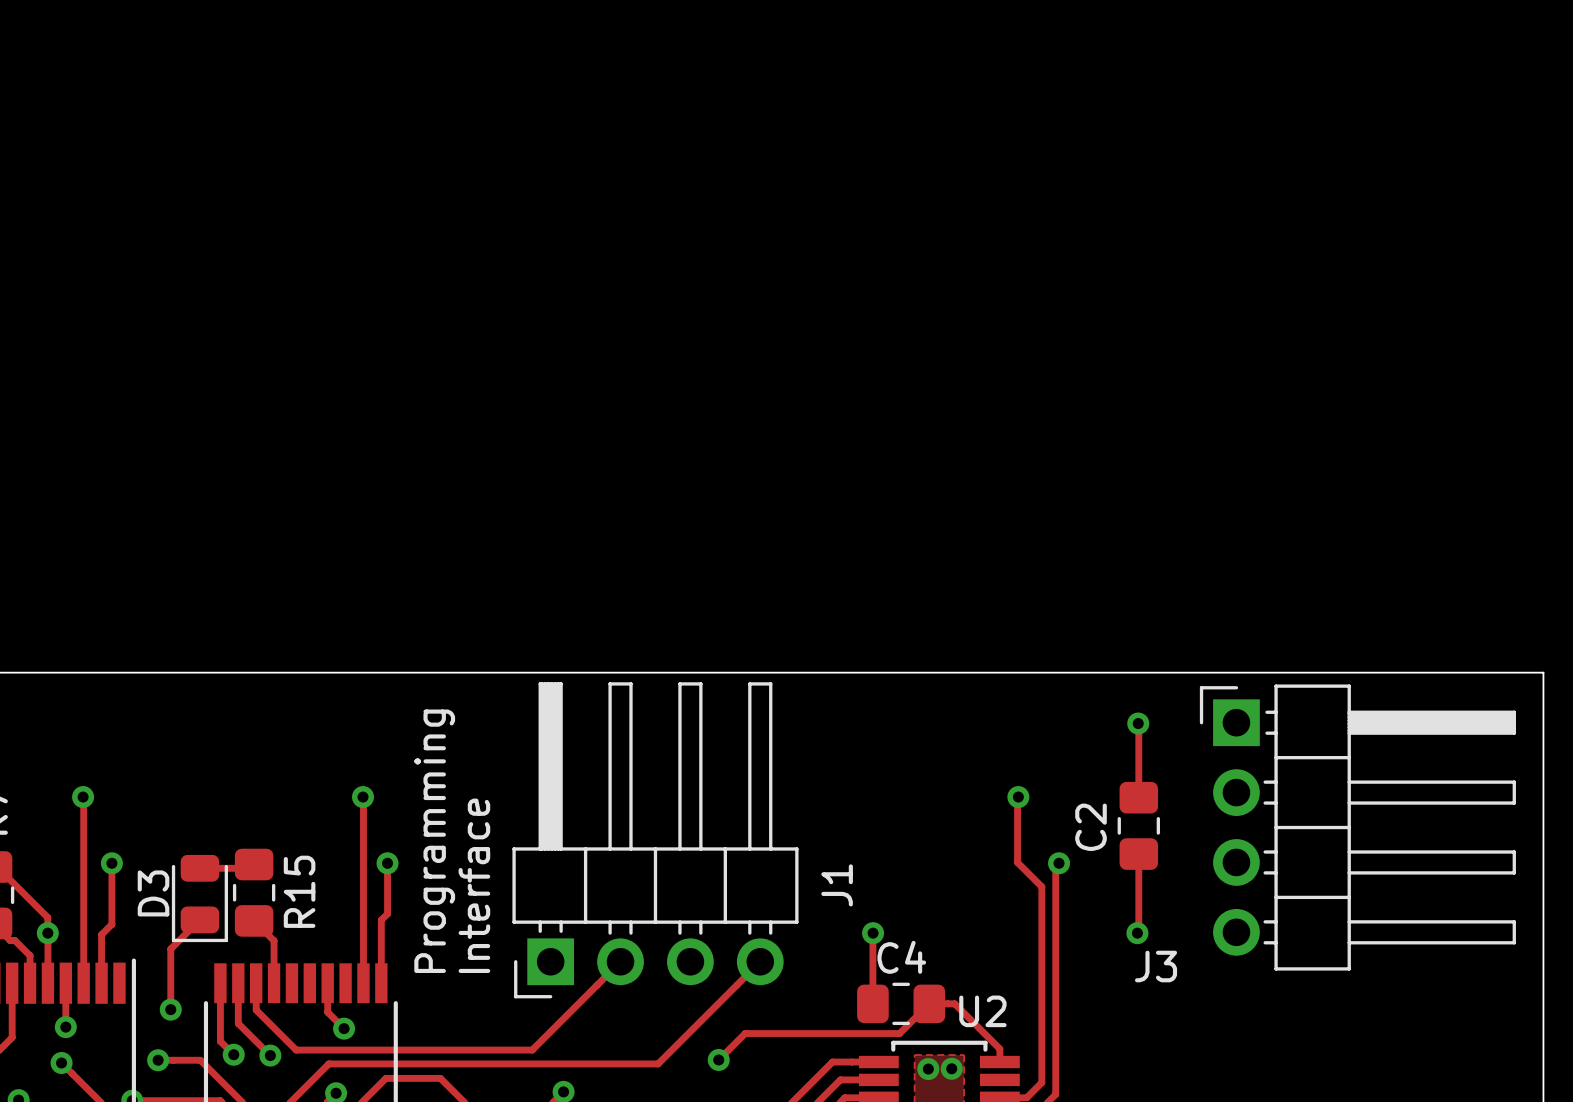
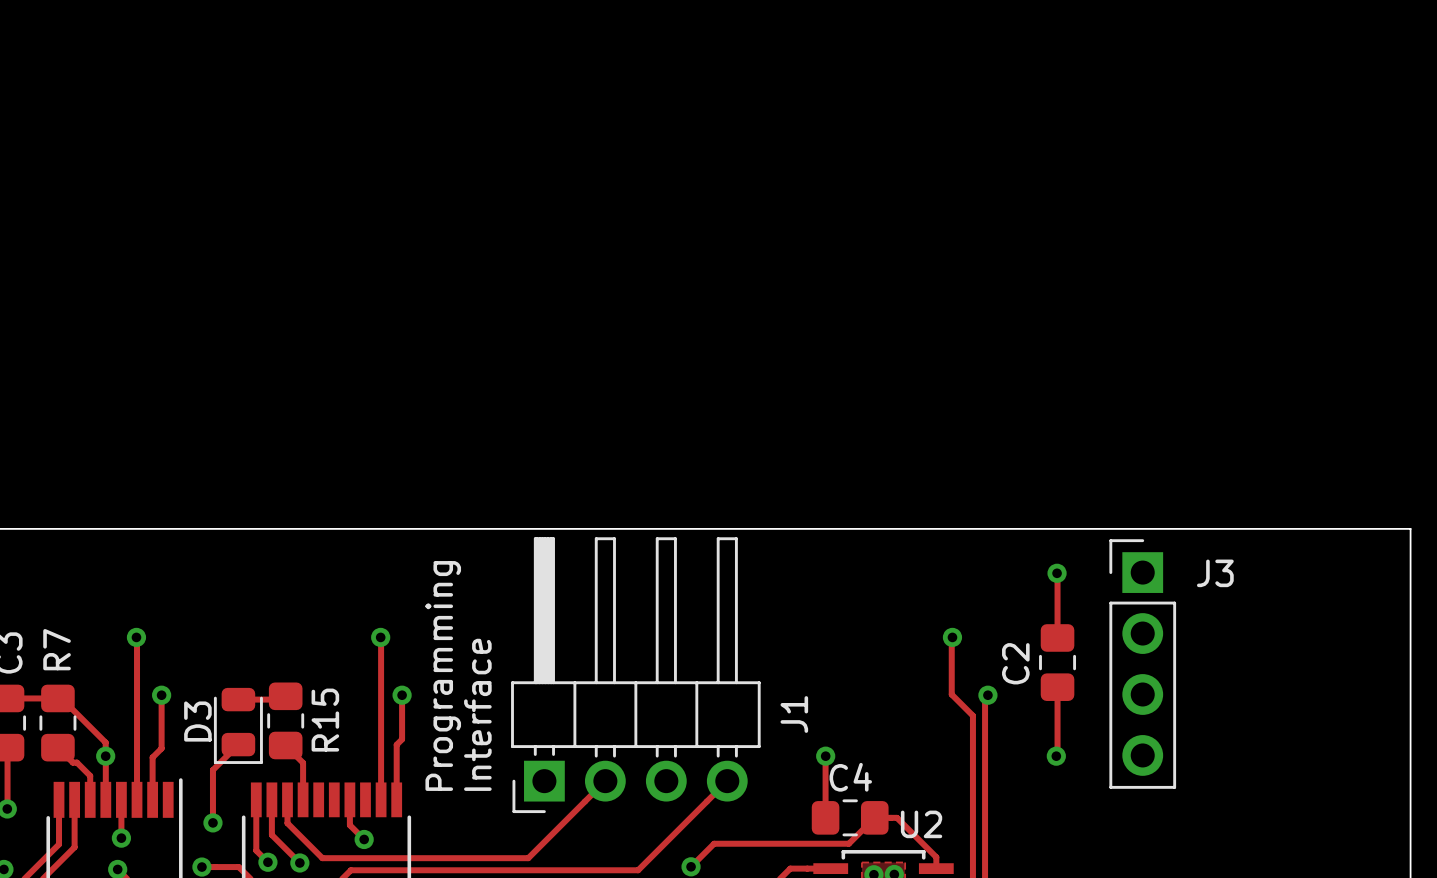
J3 footprint: [1199, 684, 1516, 971] -> [1109, 539, 1177, 789]
J3 name position: J3 (1156, 966) -> J3 (1215, 573)

